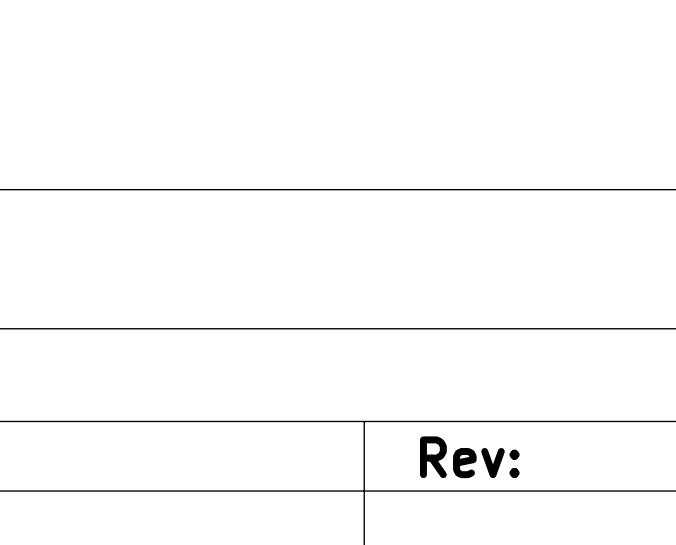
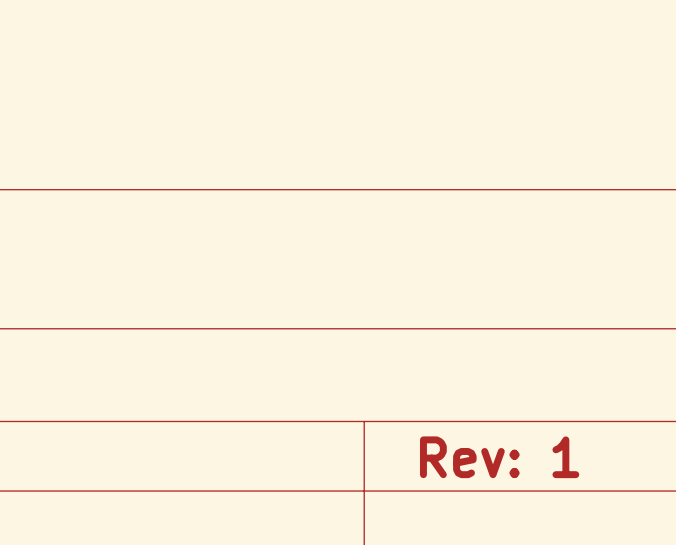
title block: Rev: (469, 457) -> Rev: 1 (499, 457)

